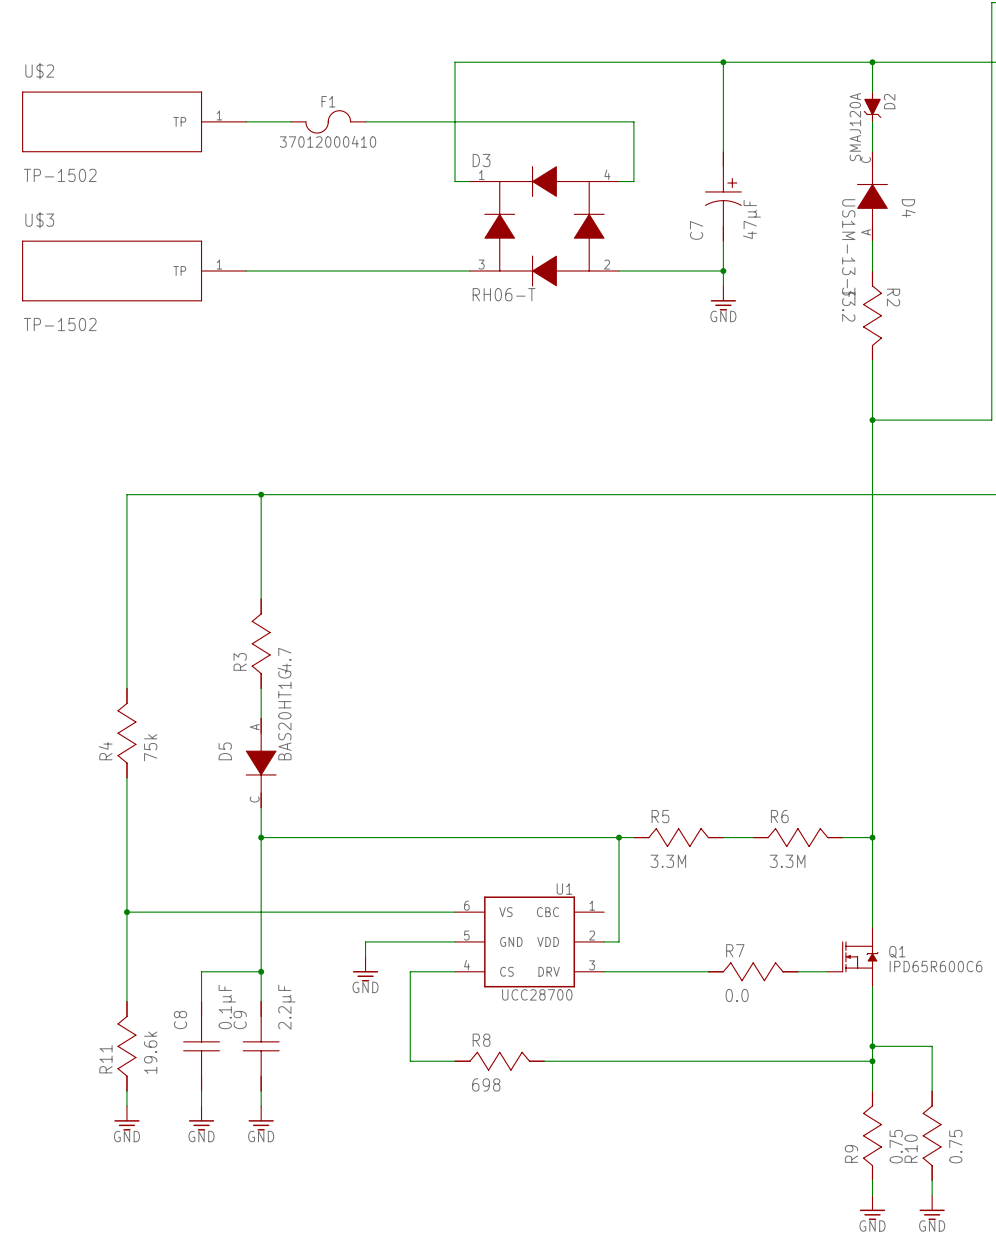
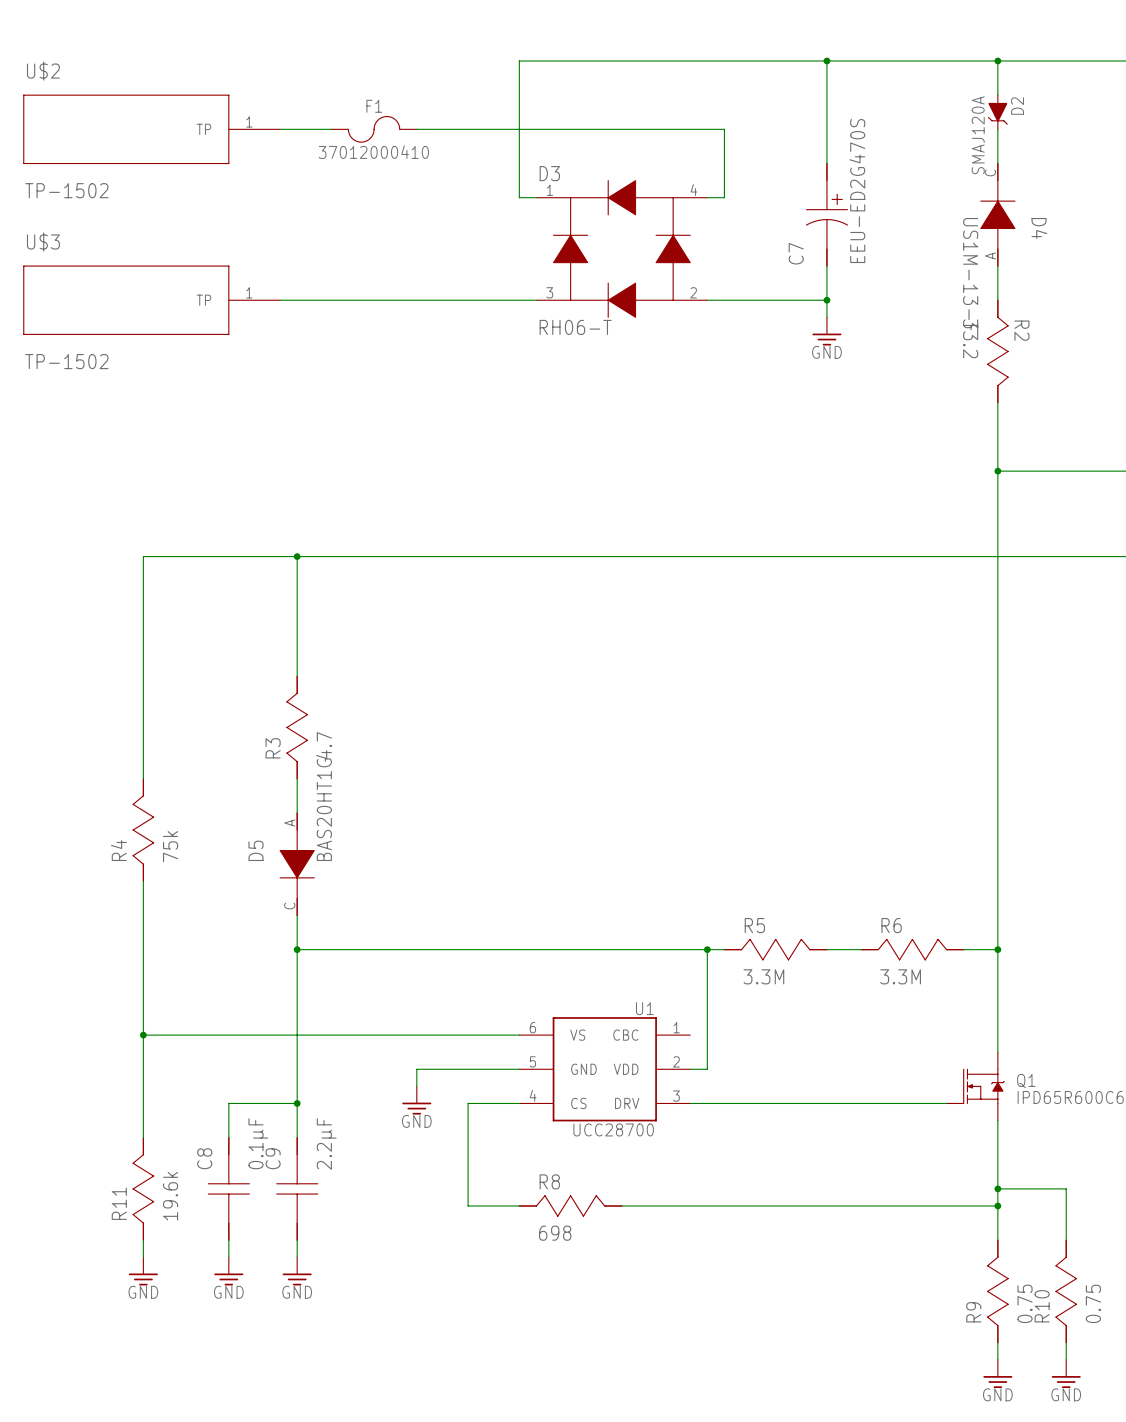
C7 value: 47µF (751, 219) -> EEU-ED2G470S (857, 191)
wire: none -> (809, 1103) (912, 1103)
R7: 0.0 (753, 971) -> none

